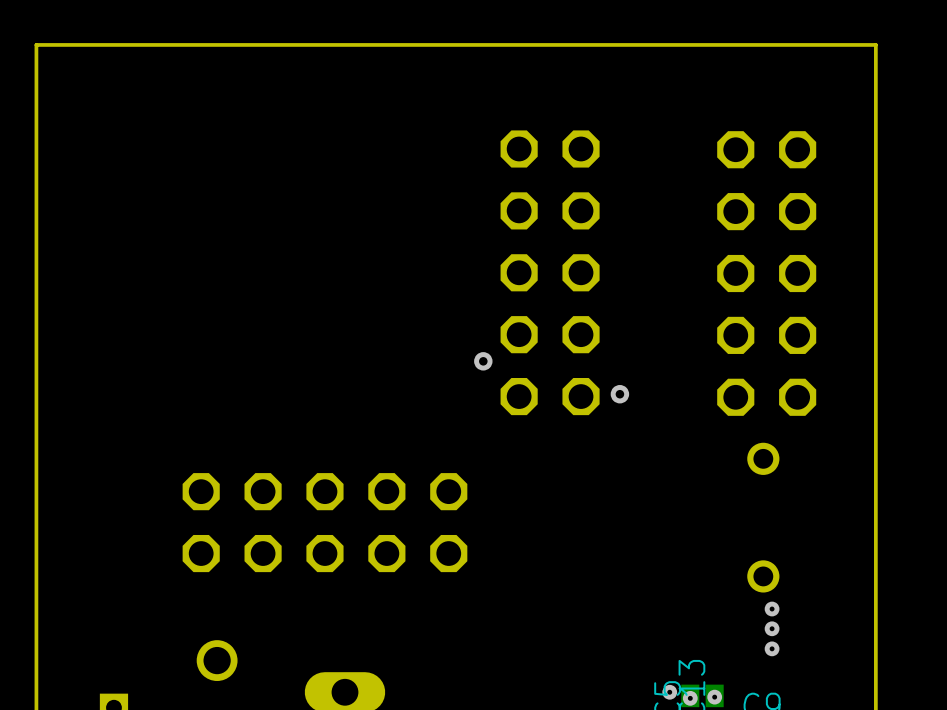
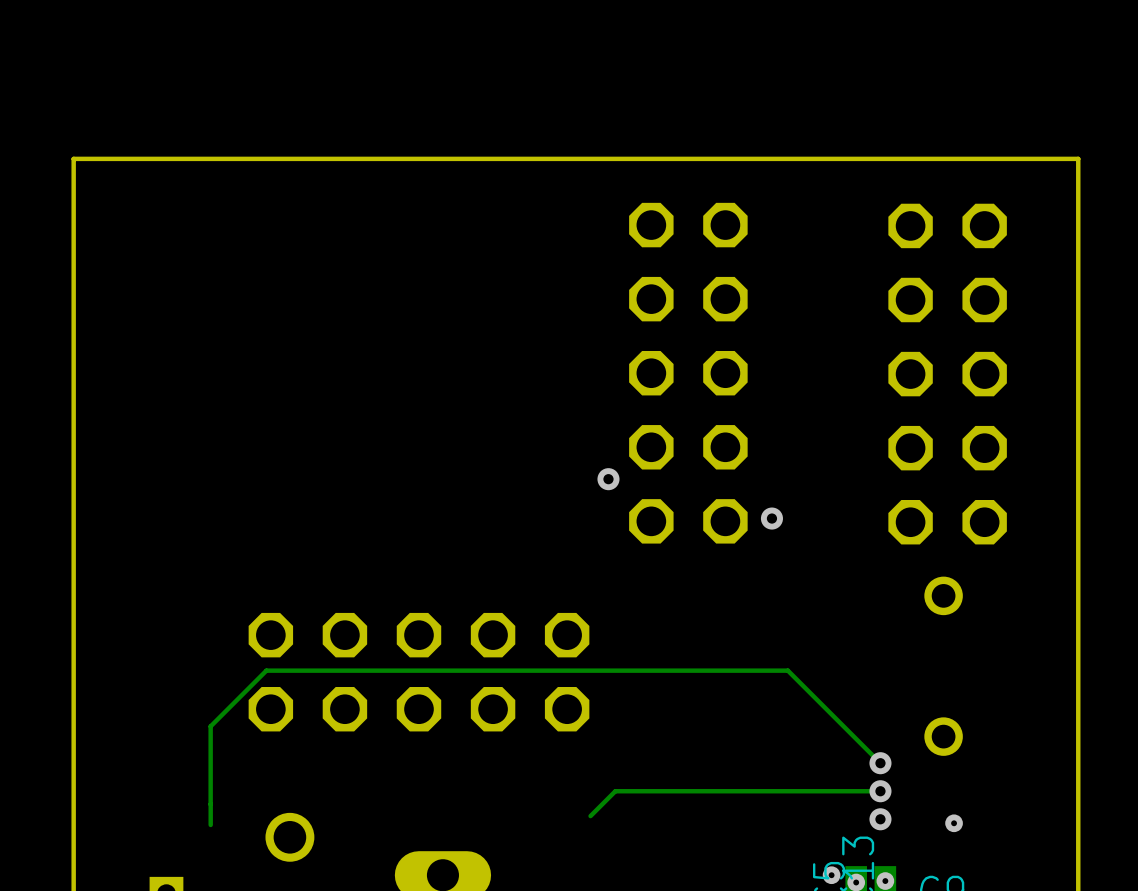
board edge: (875, 93) (875, 44) (36, 44) (36, 93) -> (1078, 158) (73, 158)
track: none -> (880, 763) (787, 670) (266, 670) (210, 726) (210, 824)
via: none -> (880, 763)
via: (772, 609) -> none
track: none -> (880, 791) (615, 791) (590, 816)
via: none -> (880, 791)
via: (772, 628) -> none
via: none -> (880, 819)

